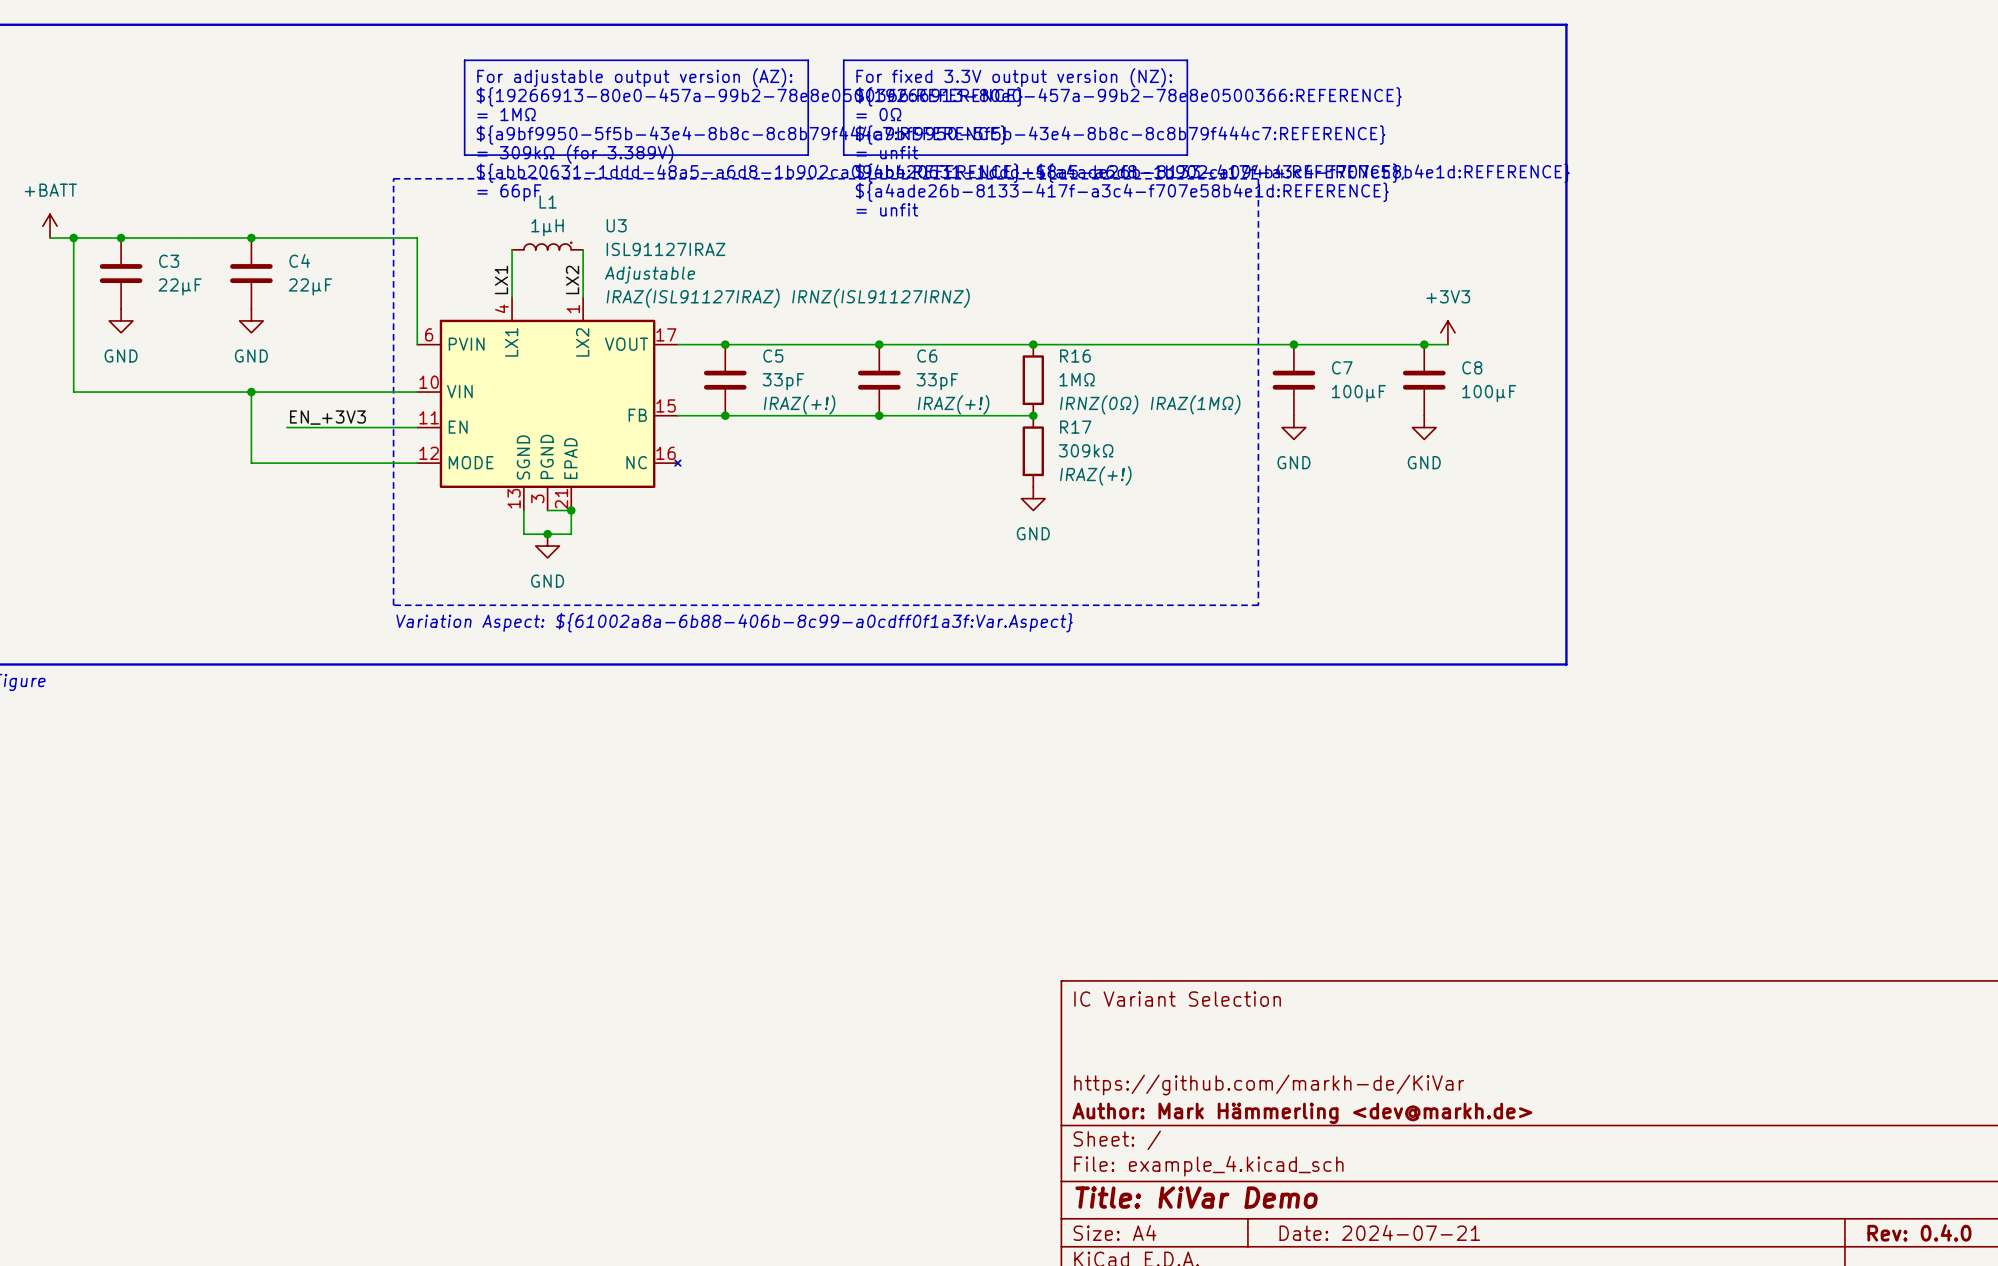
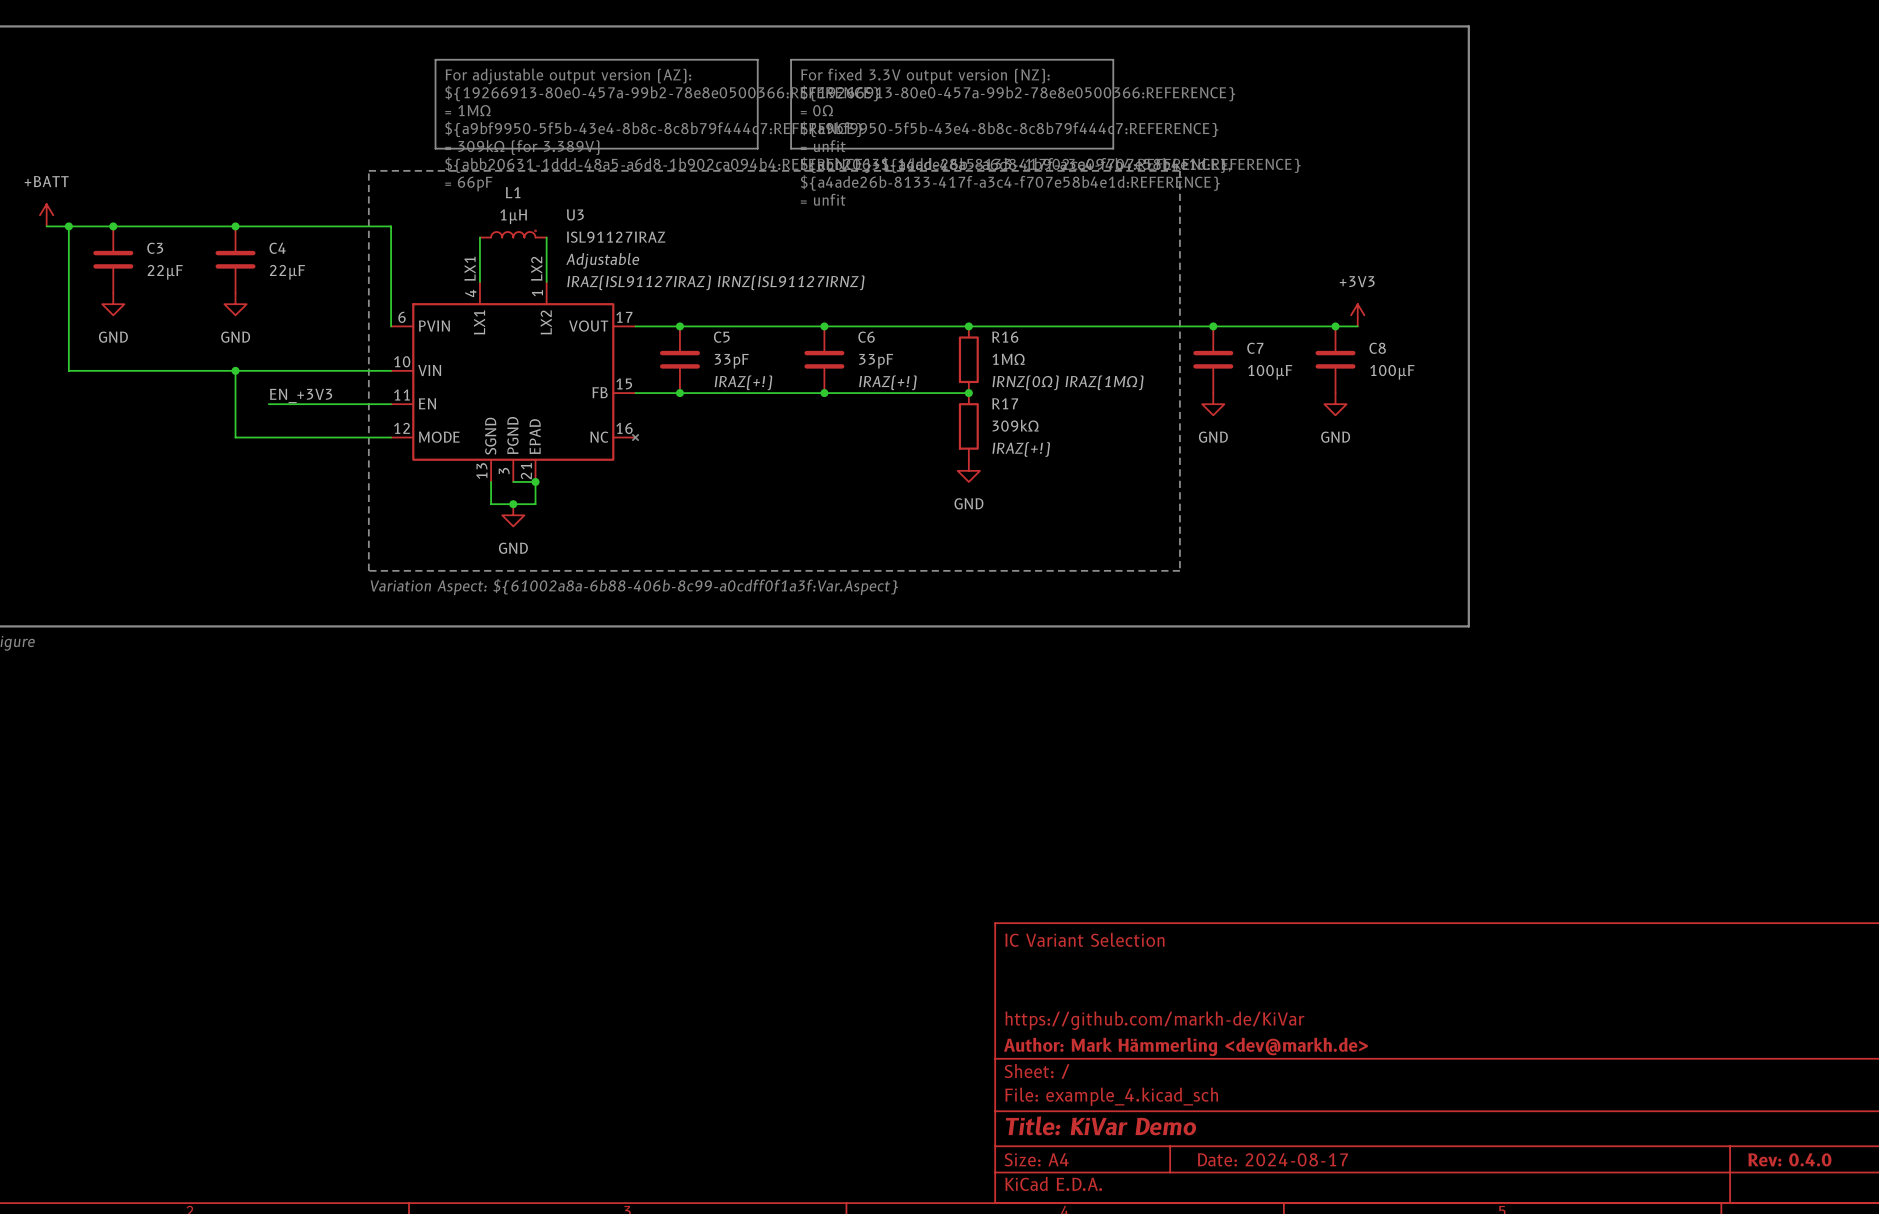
title block: Date: 2024-07-21 (1379, 1232) -> Date: 2024-08-17 (1272, 1159)

